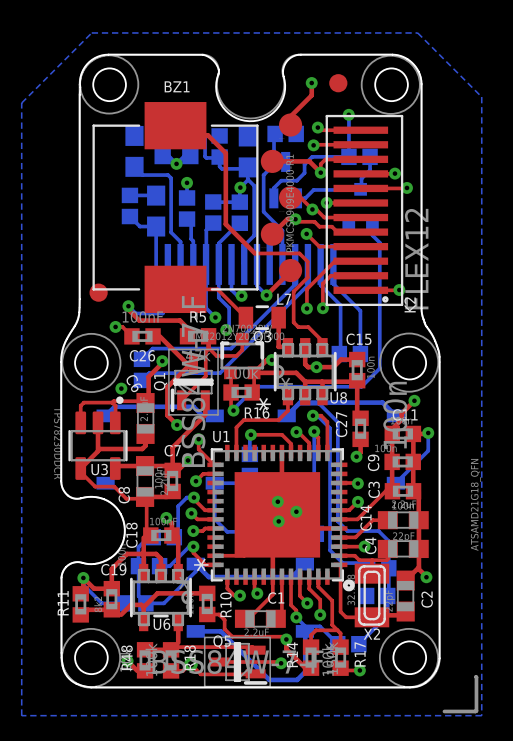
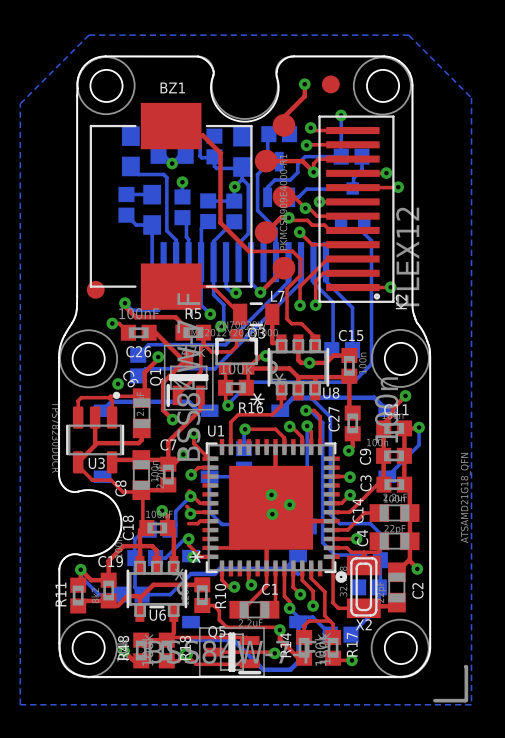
bottom track: (193, 497) (186, 497) (178, 506) (178, 533) (174, 537) -> none
via: (193, 497) -> none
bottom track: none -> (190, 496) (175, 511) (175, 525) (170, 531)
via: none -> (190, 496)
via: (191, 513) -> none
via: none -> (190, 513)
via: (193, 531) -> none
via: none -> (193, 557)
bottom track: (225, 577) (208, 577) (195, 564) (195, 571) (163, 603) -> (219, 568) (214, 573) (191, 573) (170, 594) (159, 594)
bottom track: none -> (292, 568) (298, 573)
bottom track: (195, 631) (220, 631) (239, 649) -> (191, 639) (233, 639)

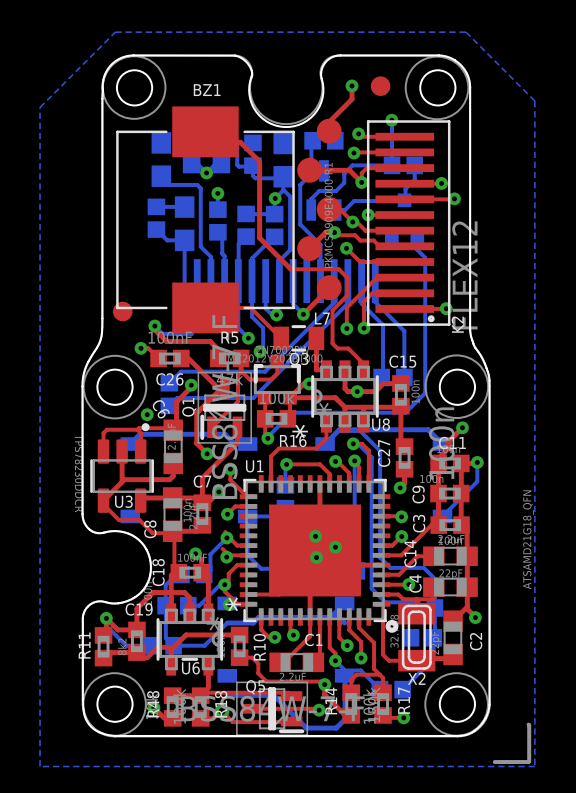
top track: (188, 523) (197, 523) -> (228, 584) (228, 573) (234, 567)

